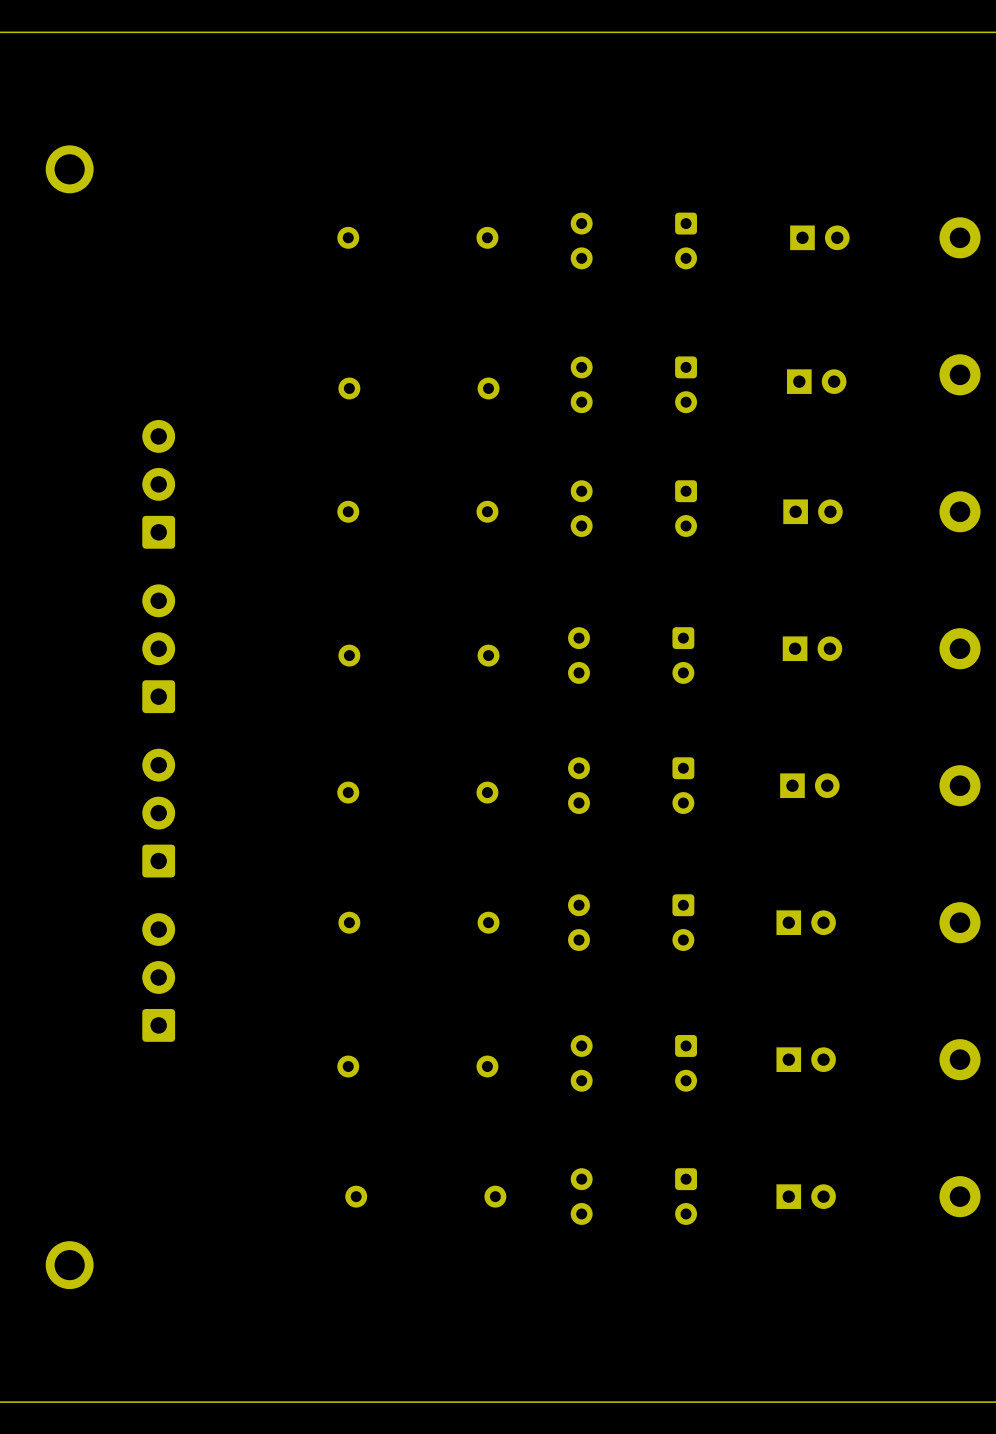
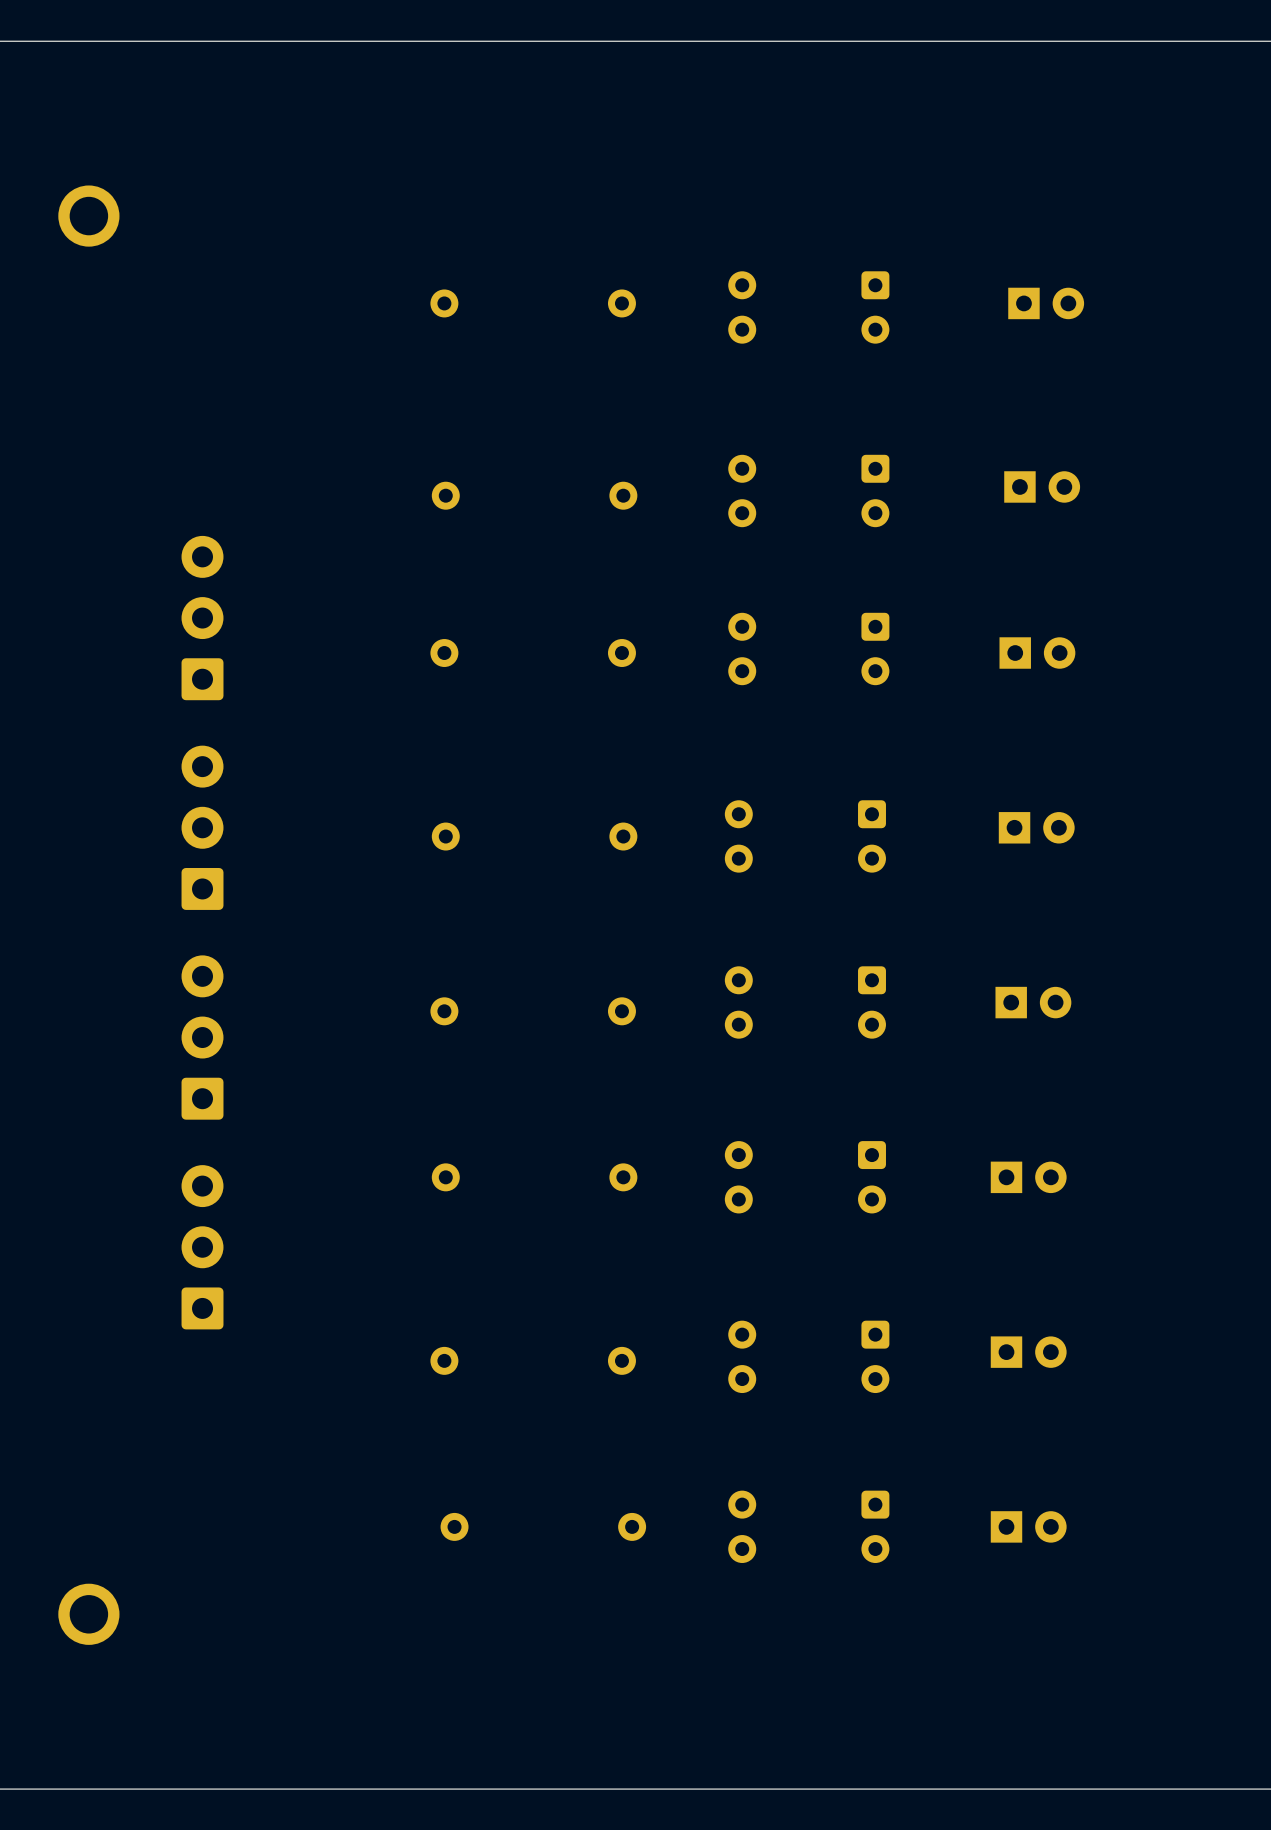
part: (960, 237) -> none
part: (960, 374) -> none
part: (960, 511) -> none
part: (960, 648) -> none
part: (960, 785) -> none
part: (960, 922) -> none
part: (960, 1059) -> none
part: (960, 1196) -> none

